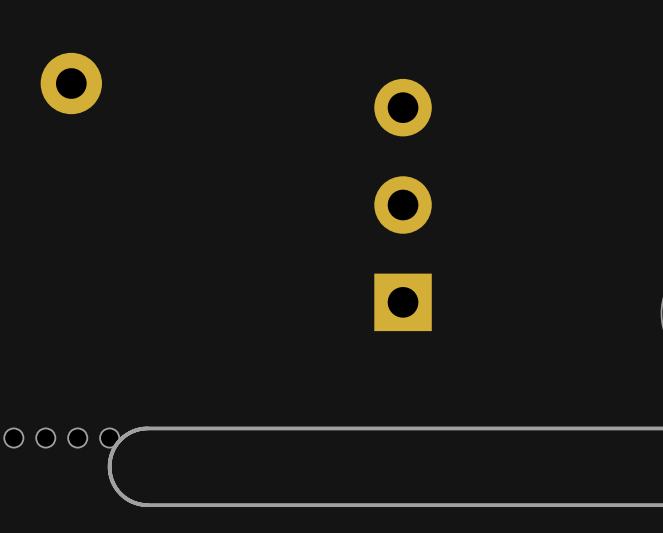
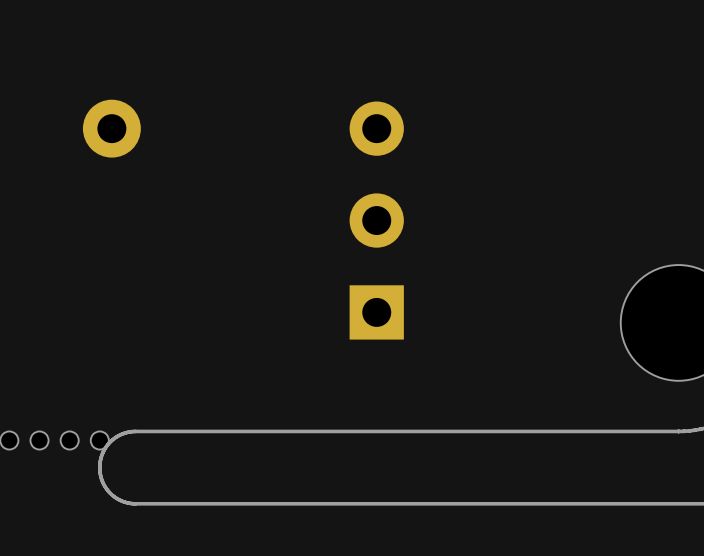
part position: (71, 83) -> (111, 128)

